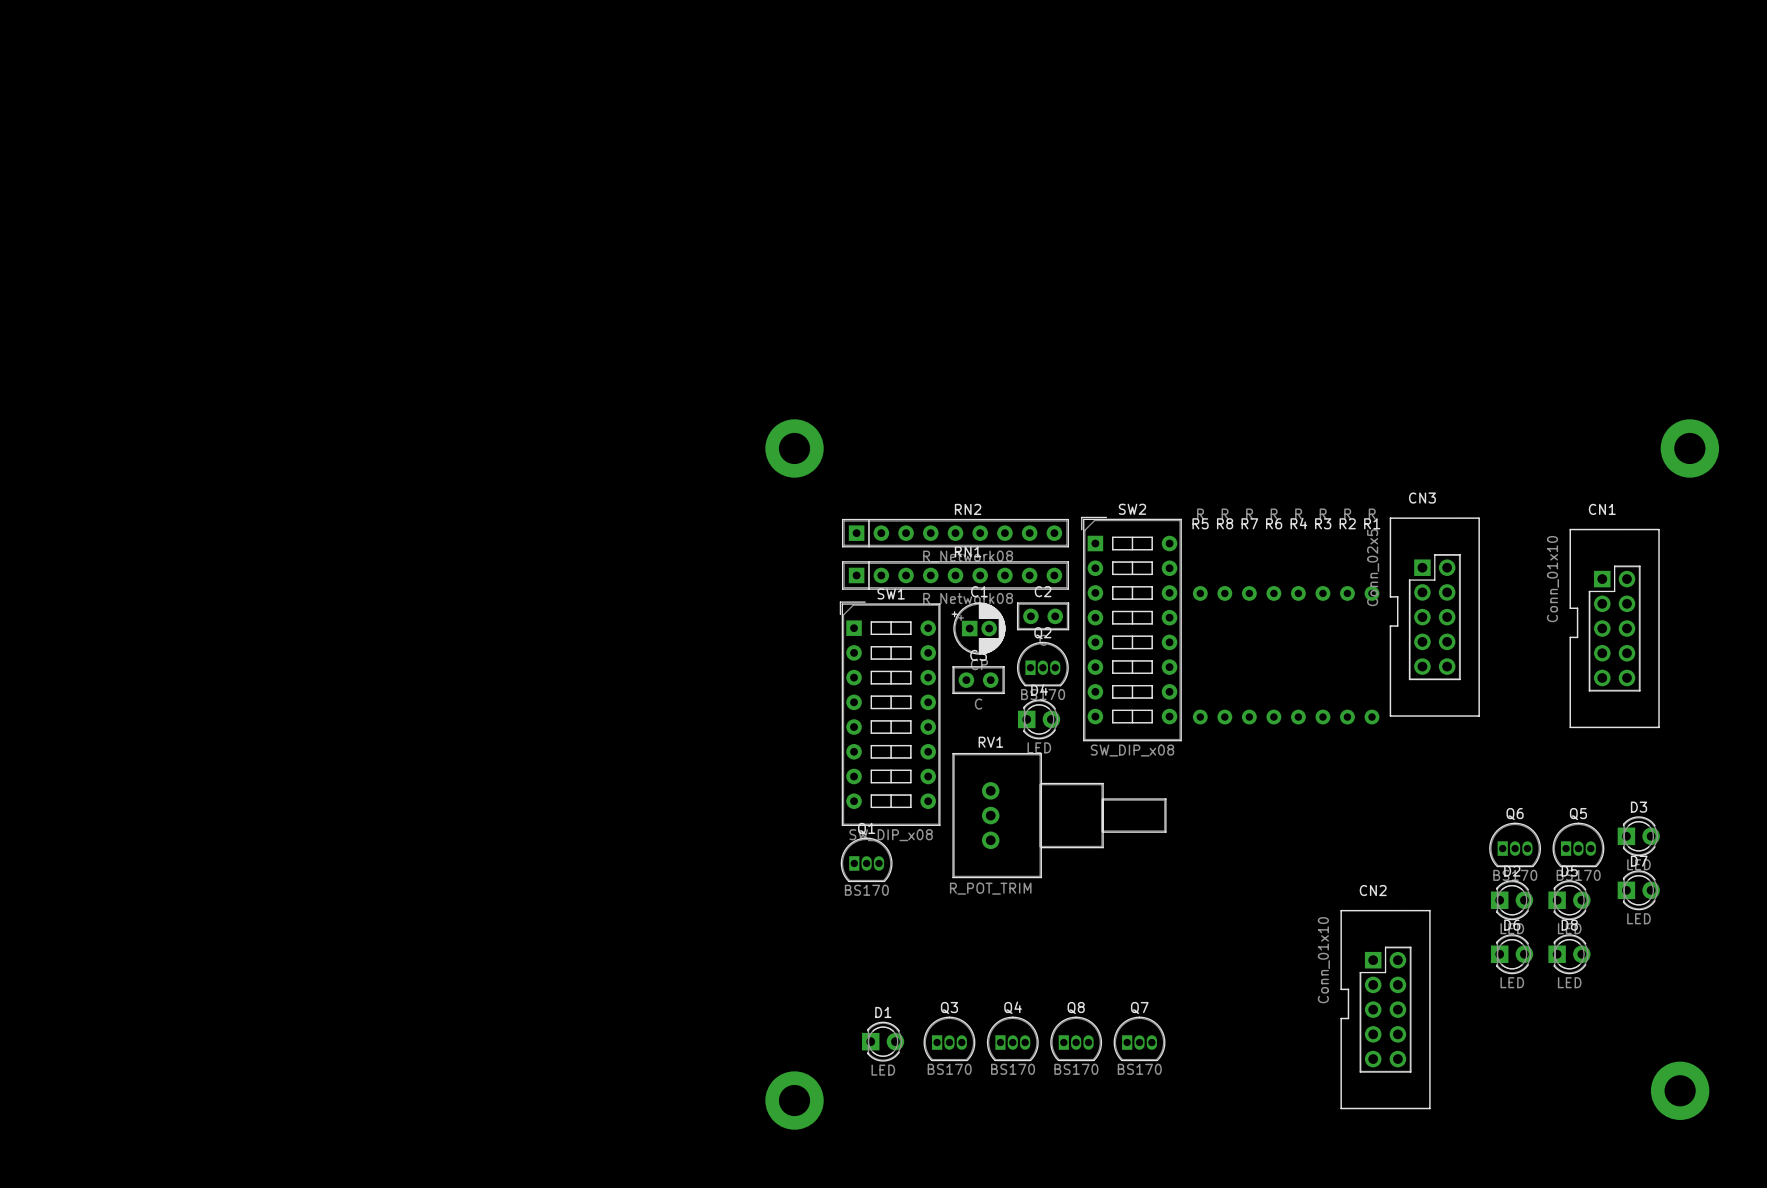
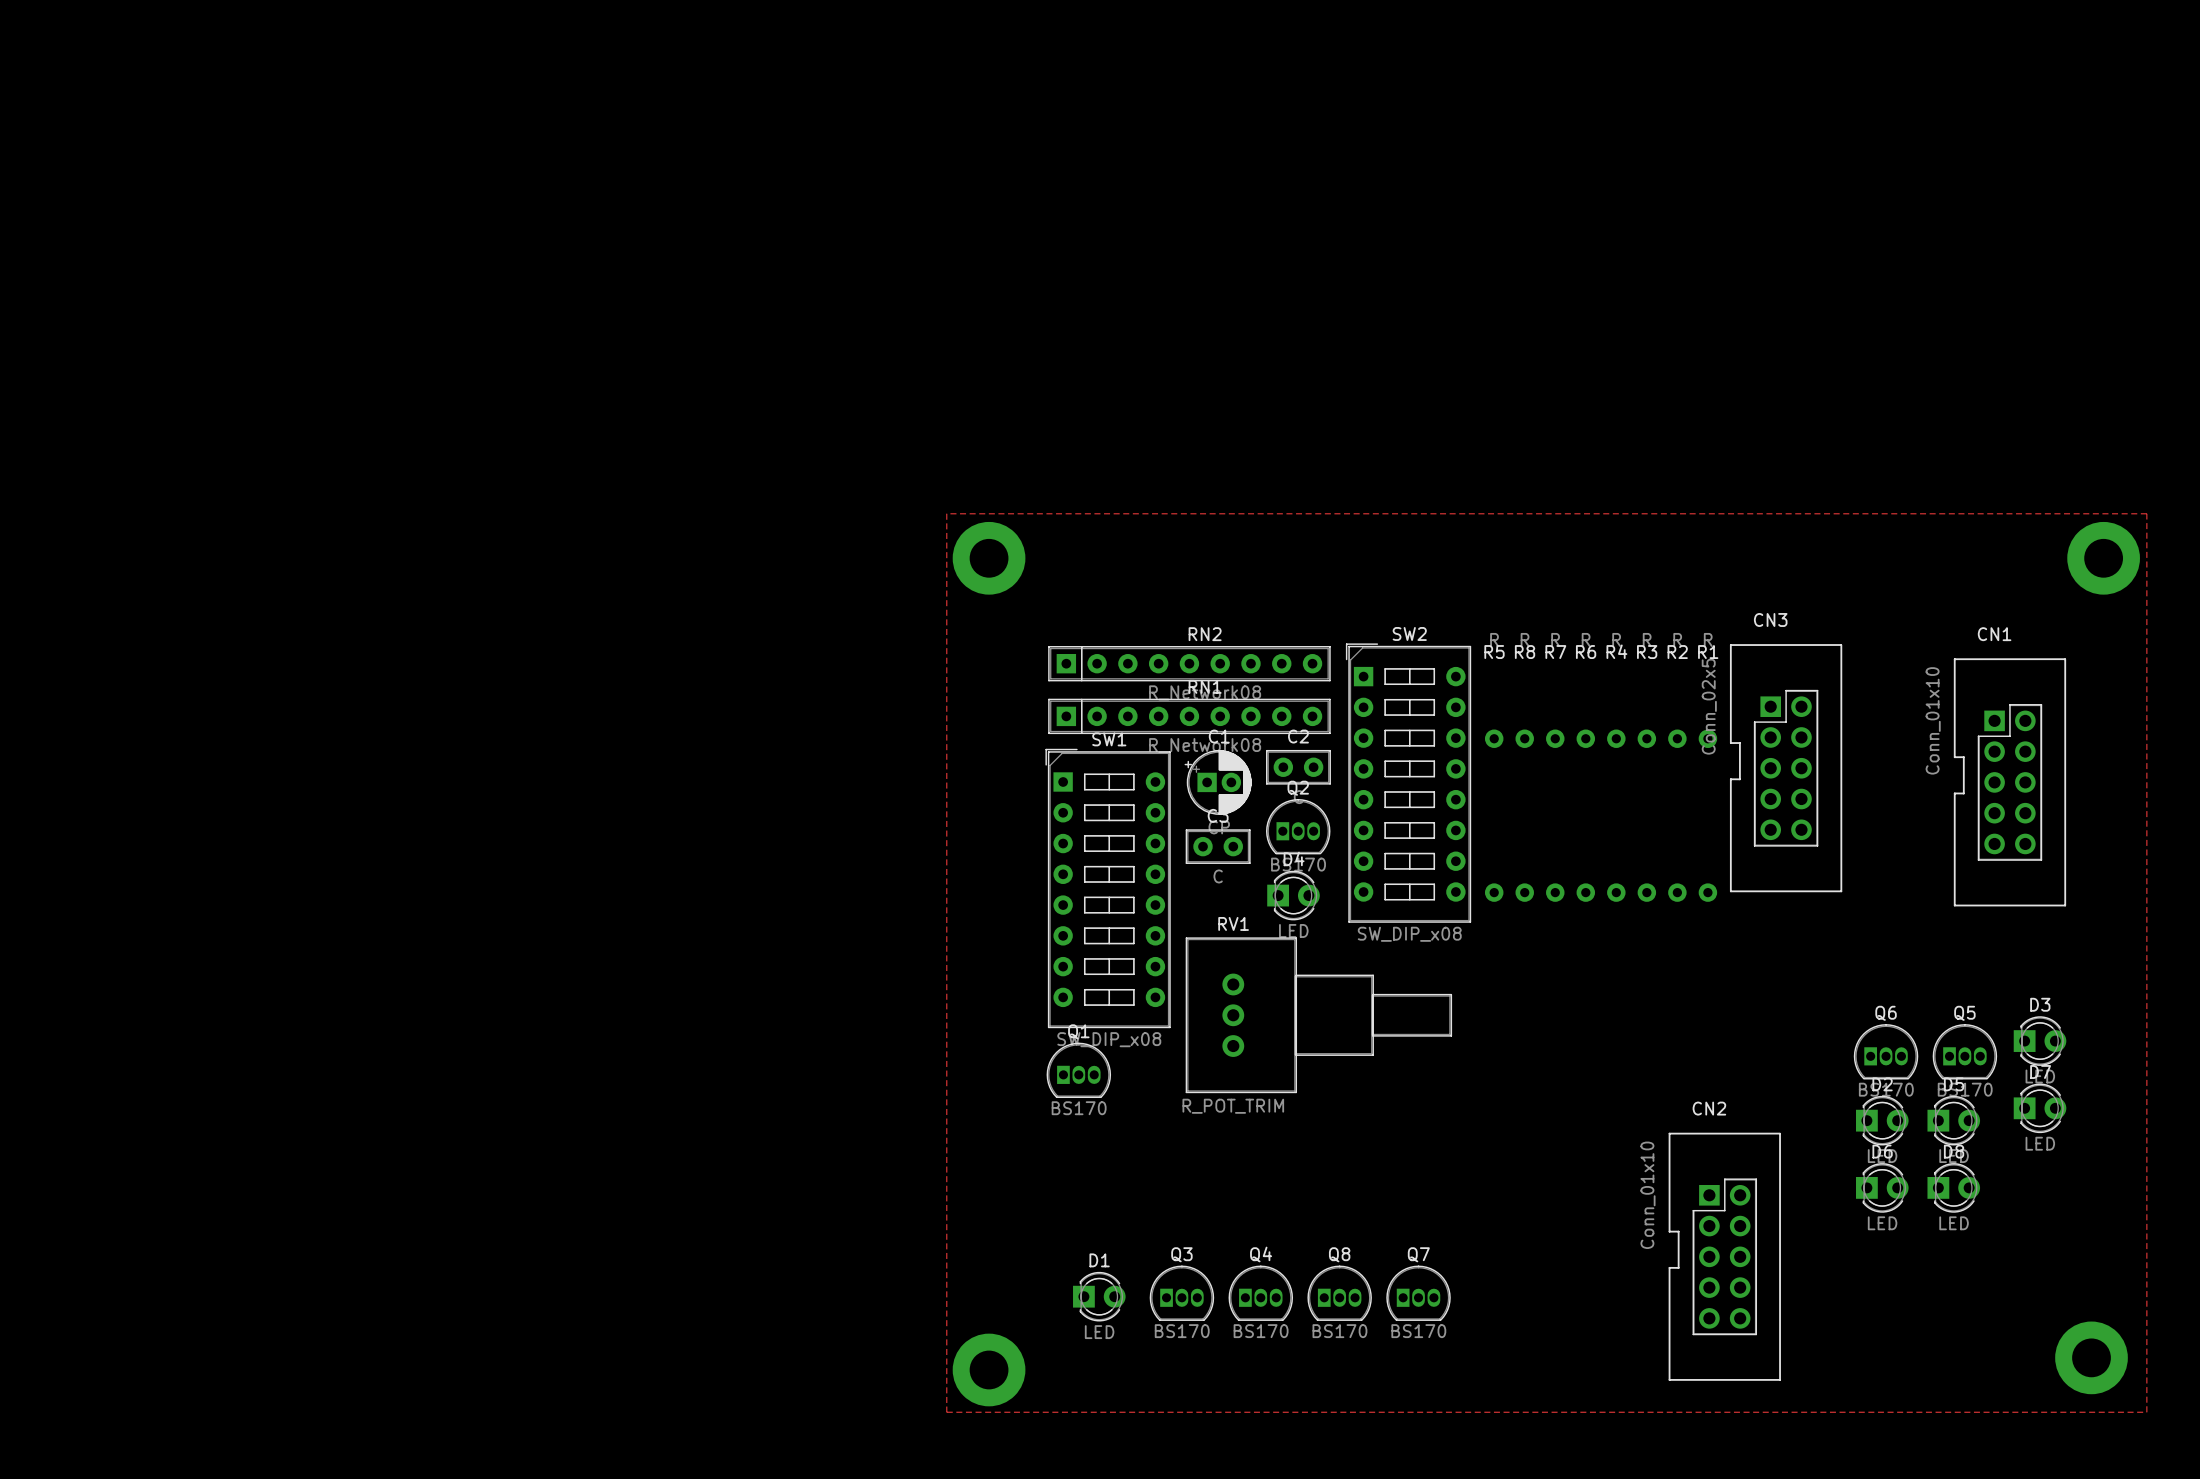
zone outline: none -> (946, 513) (2146, 513) (2146, 1412) (946, 1412) (946, 513)

